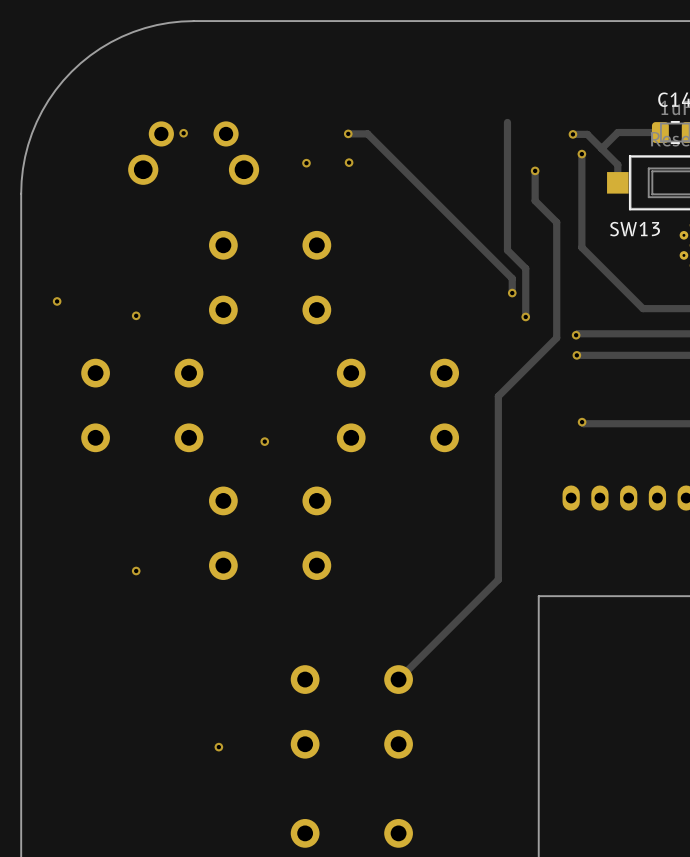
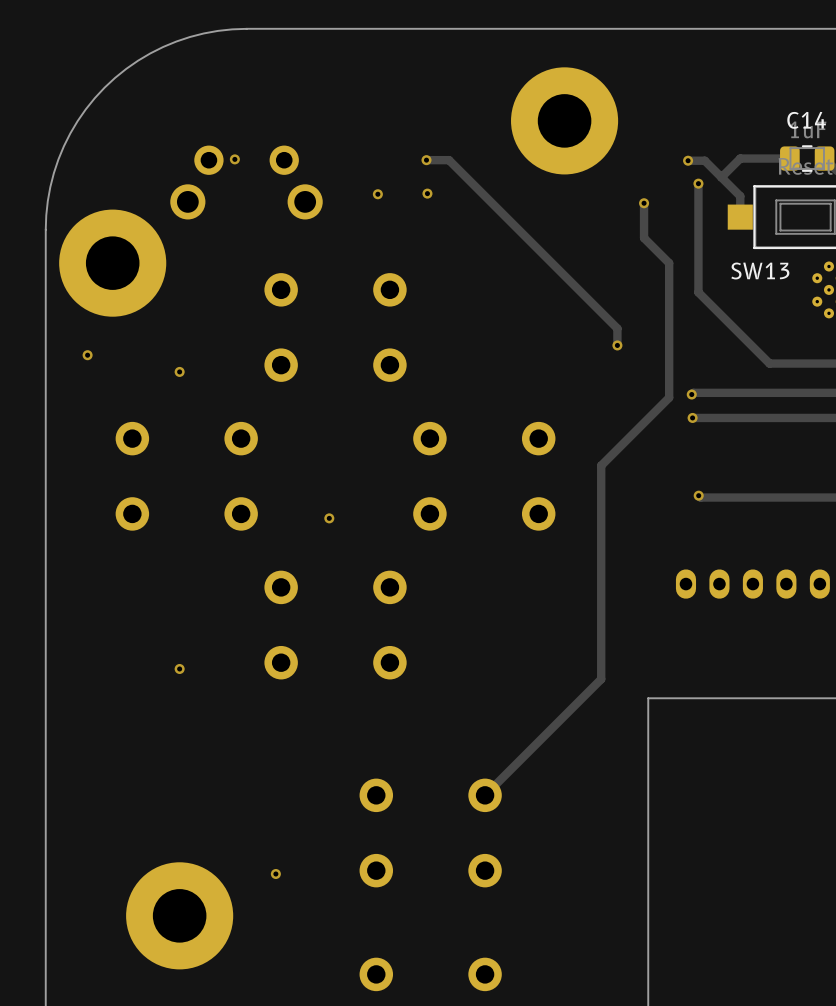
part: none -> (564, 120)
track: (507, 122) (507, 250) (525, 268) (525, 316) -> none
part: none -> (112, 263)
via: (525, 316) -> none
part: none -> (179, 915)

